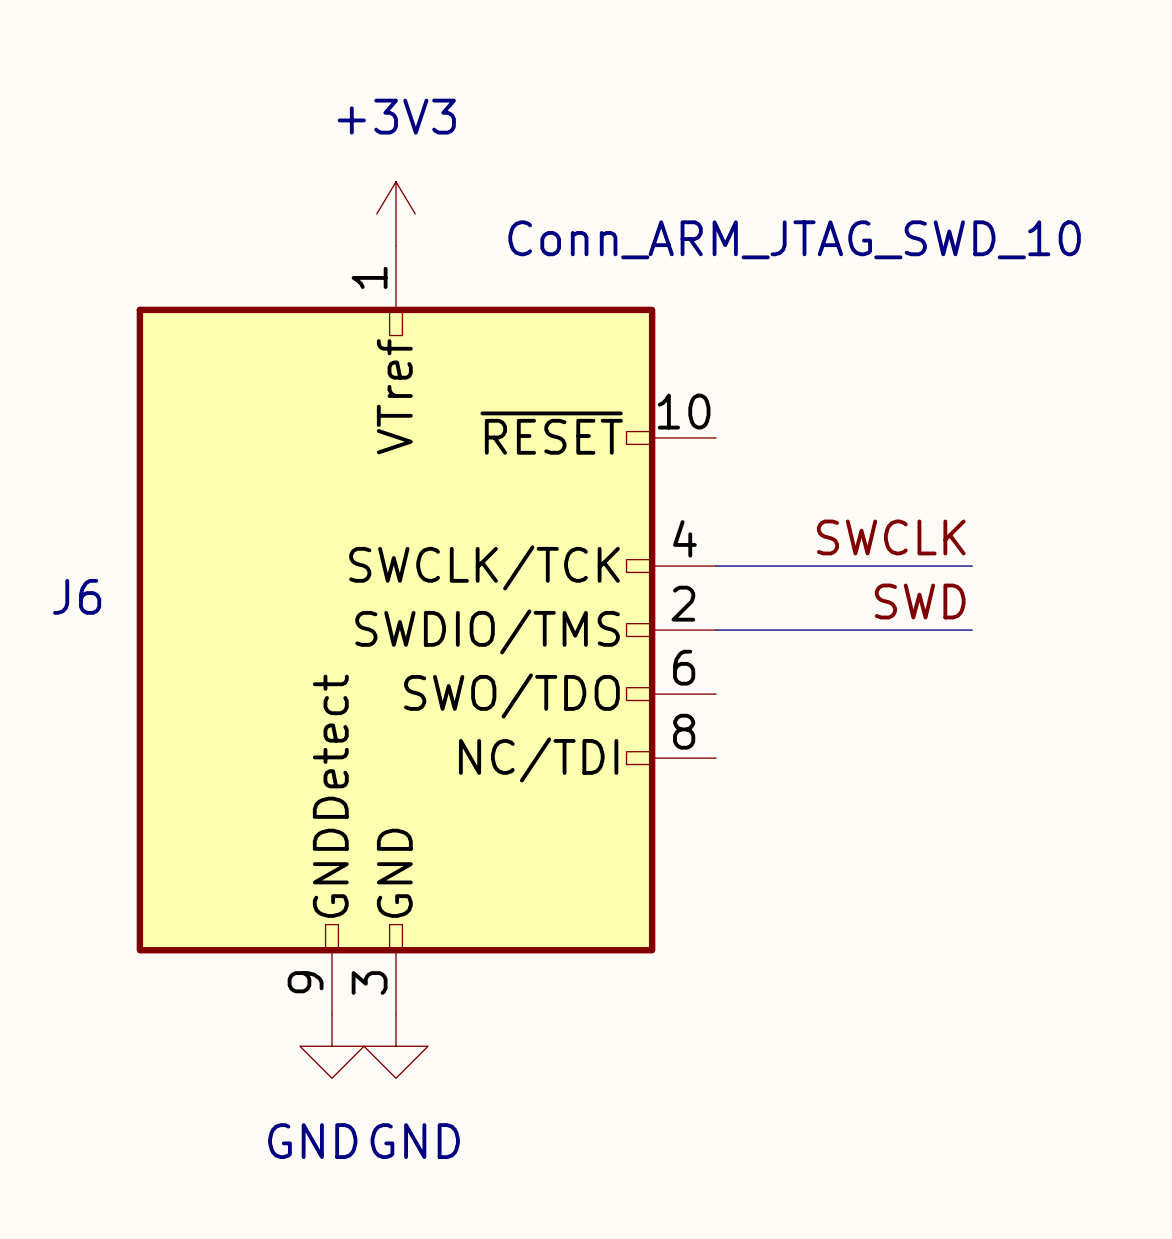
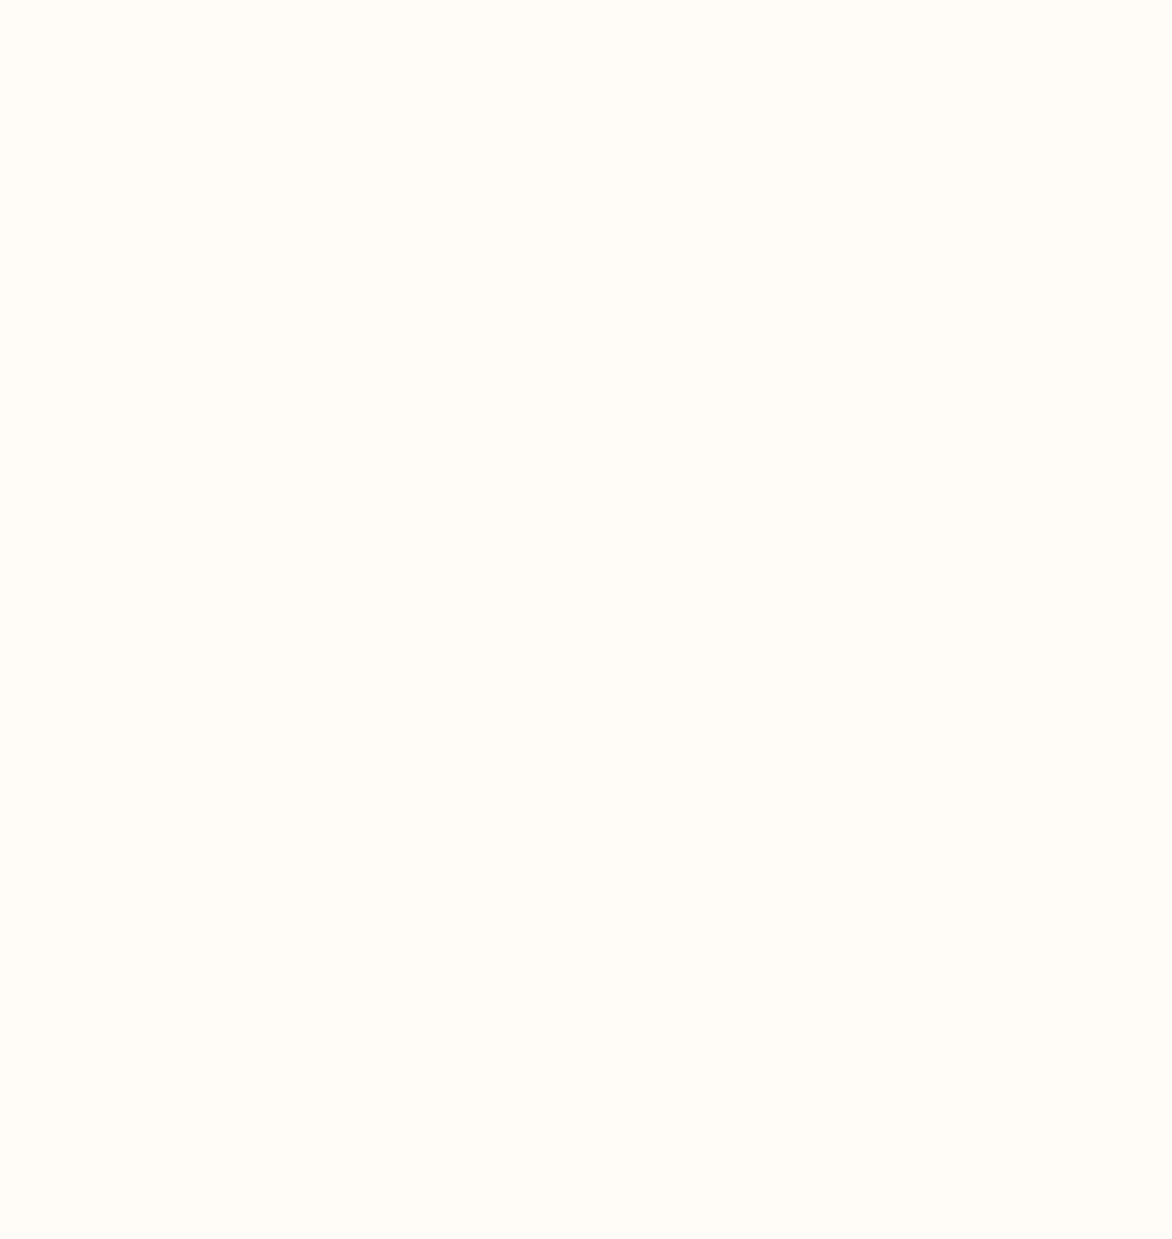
power symbol: +3V3 (396, 213) -> none
label: SWCLK (891, 537) -> none
wire: (716, 566) (972, 566) -> none
label: SWD (920, 601) -> none
J6: Conn_ARM_JTAG_SWD_10 (426, 630) -> none
wire: (716, 630) (972, 630) -> none
power symbol: GND (331, 1046) -> none
power symbol: GND (396, 1046) -> none

